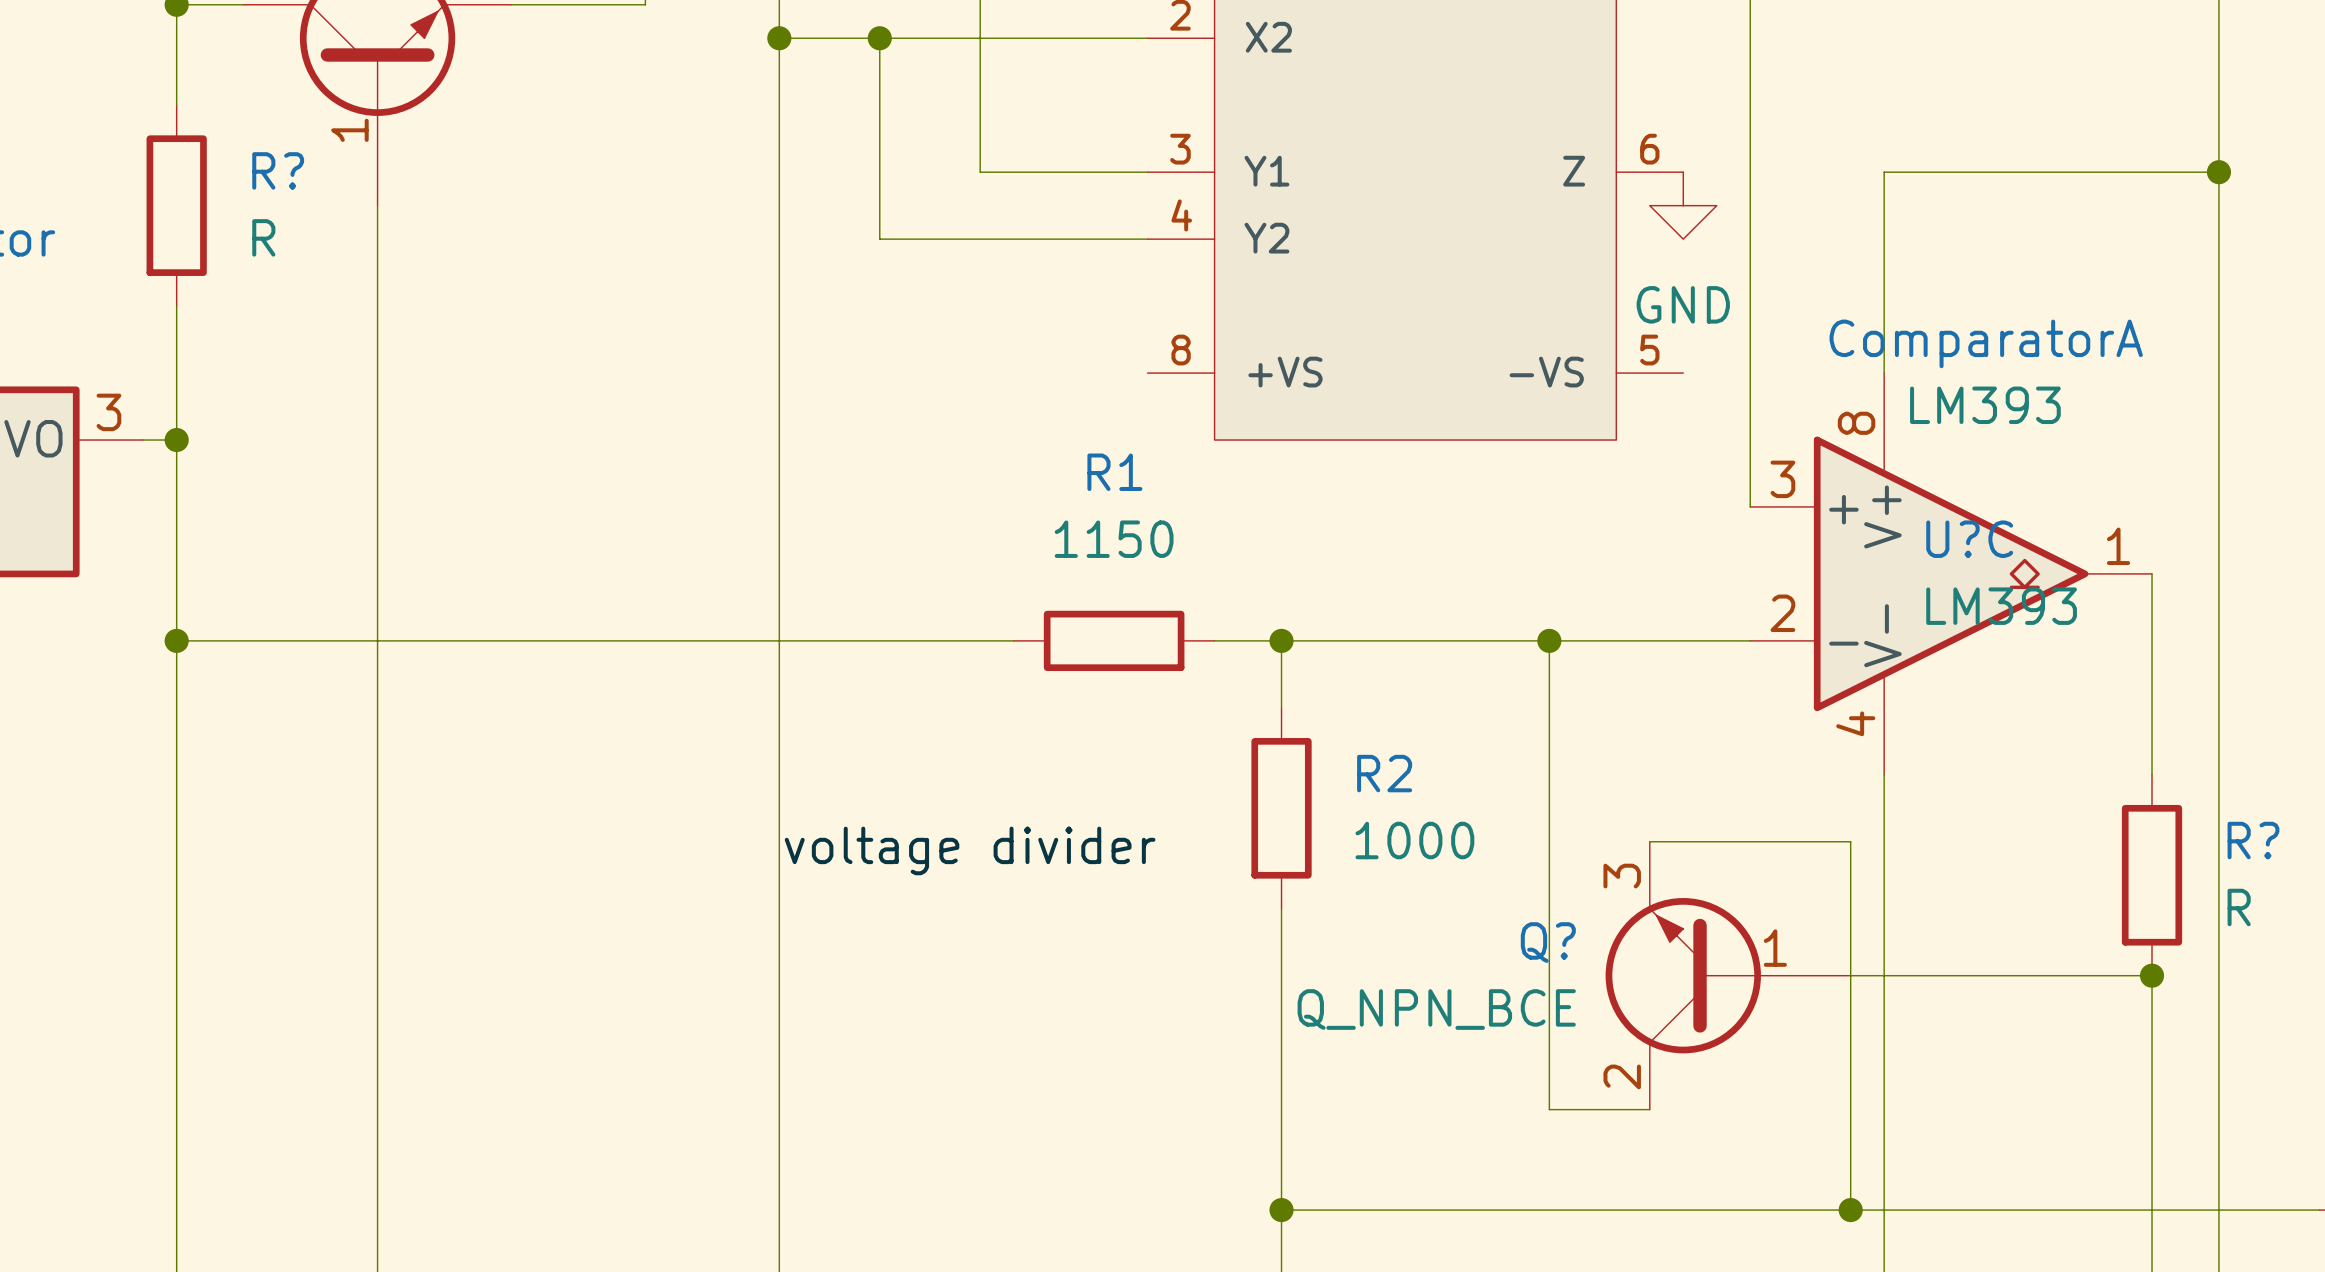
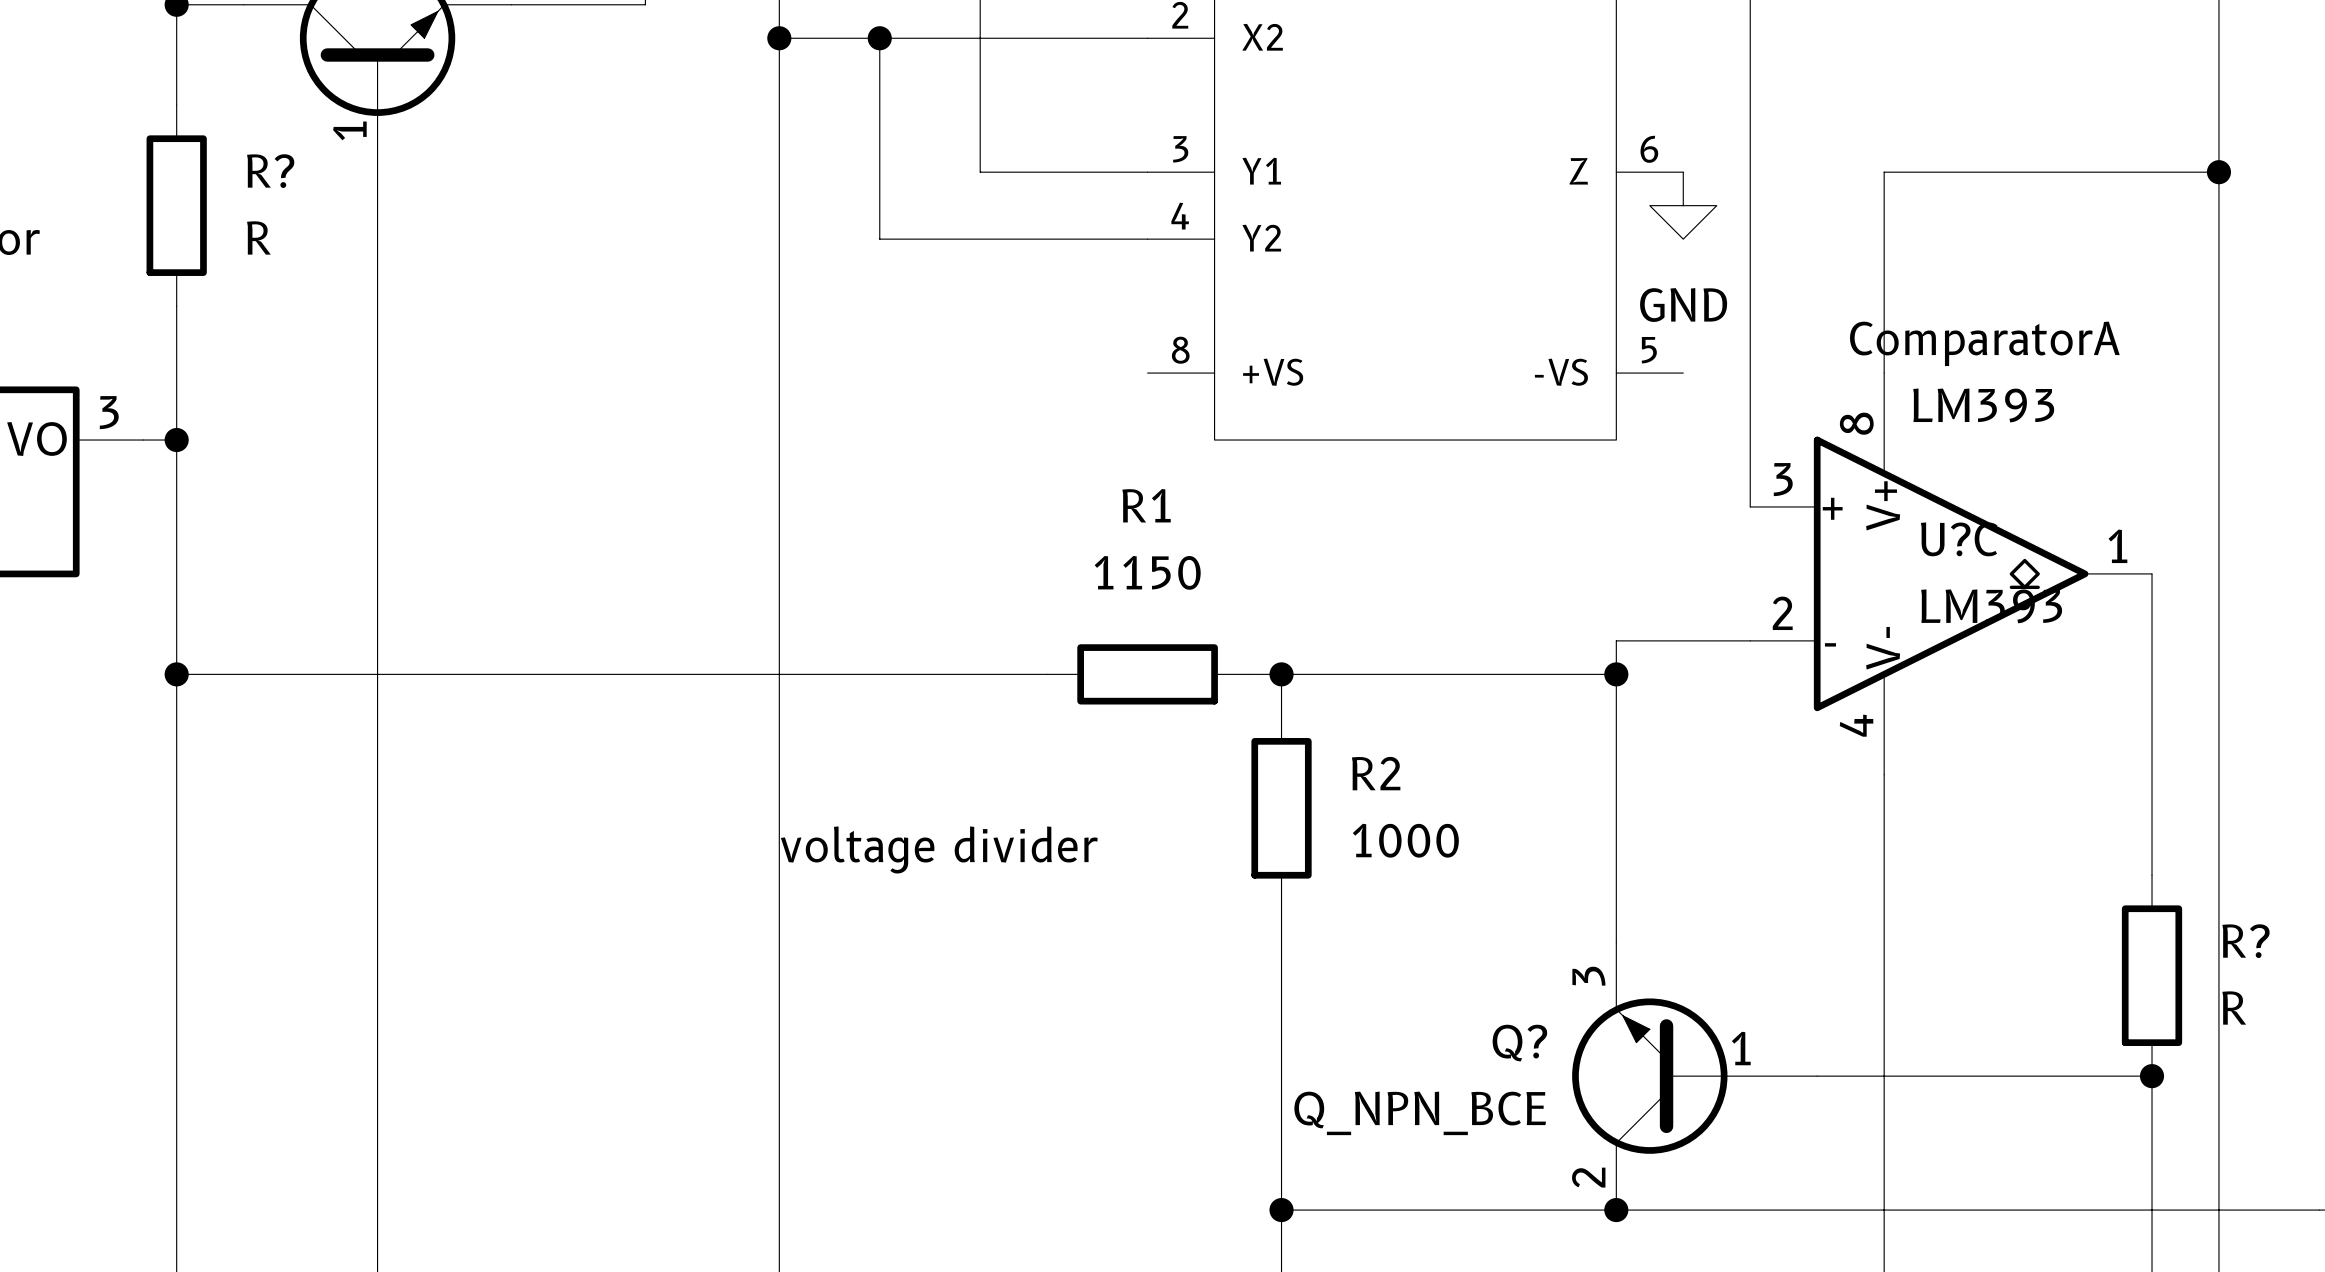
wire: (176, 640) (1013, 640) -> none
junction position: (176, 640) -> (176, 674)
R1 position: (1114, 640) -> (1147, 674)
wire: (1214, 640) (1616, 640) -> (1616, 942) (1616, 640)
wire: (1281, 640) (1281, 674) -> none
junction position: (1281, 640) -> (1281, 674)
wire: (1549, 640) (1549, 1109) (1649, 1109) -> none
junction position: (1549, 640) -> (1616, 674)
wire: none -> (176, 674) (1047, 674)
wire: none -> (1248, 674) (1616, 674)
wire: none -> (2152, 774) (2152, 875)
wire: (1649, 841) (1850, 841) (1850, 1210) -> none
R? position: (2152, 875) -> (2152, 975)
Q? position: (1728, 975) -> (1694, 1076)
wire: (1850, 975) (2152, 975) (2152, 1076) -> (1817, 1076) (2152, 1076)
junction position: (2152, 975) -> (2152, 1076)
junction: none -> (1616, 1210)
junction: (1850, 1210) -> none

